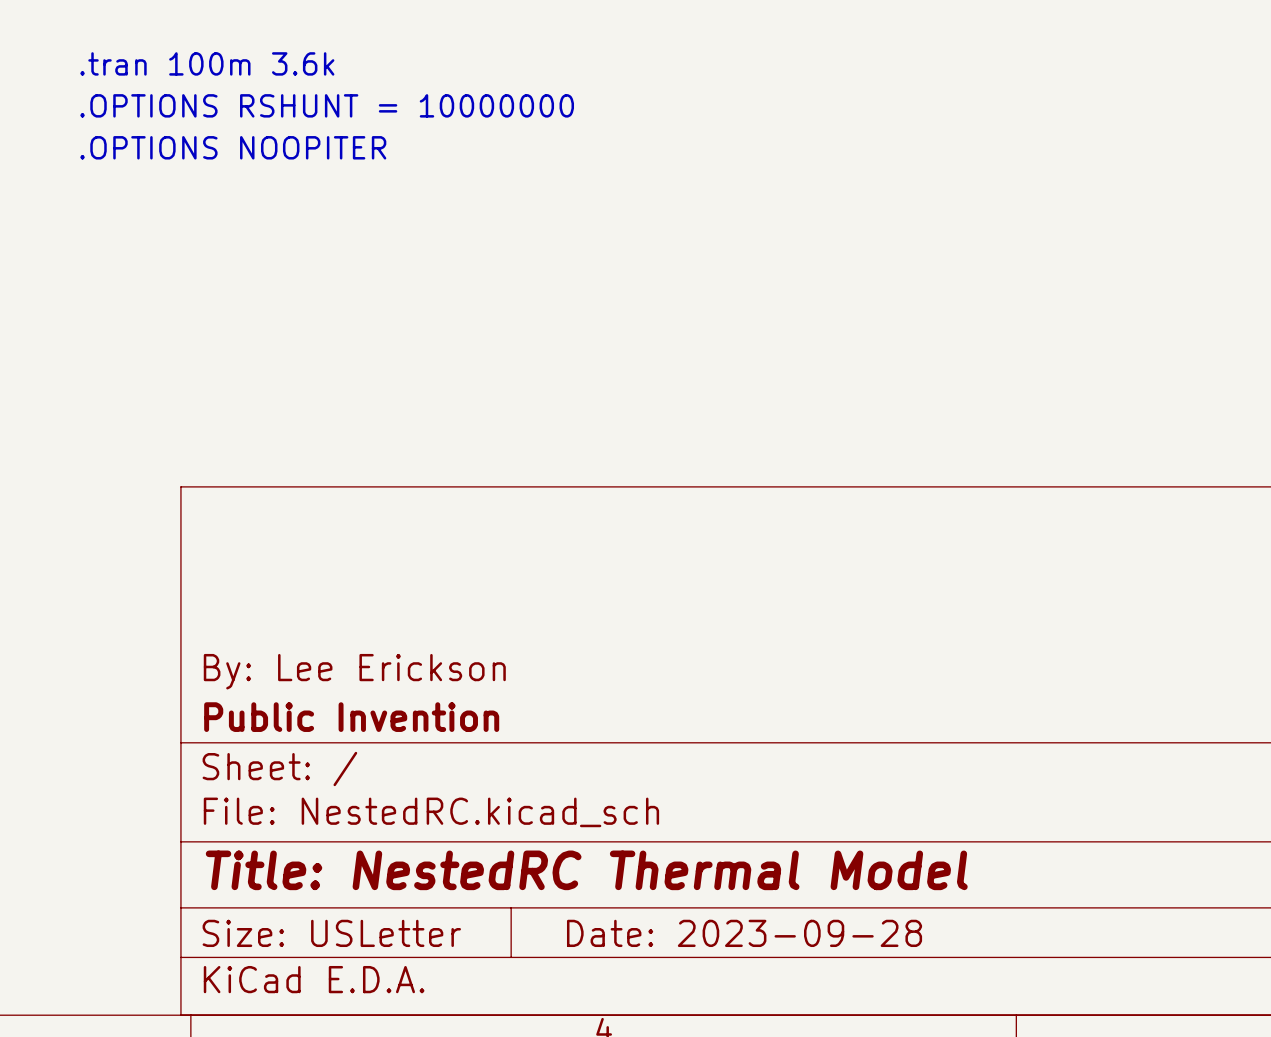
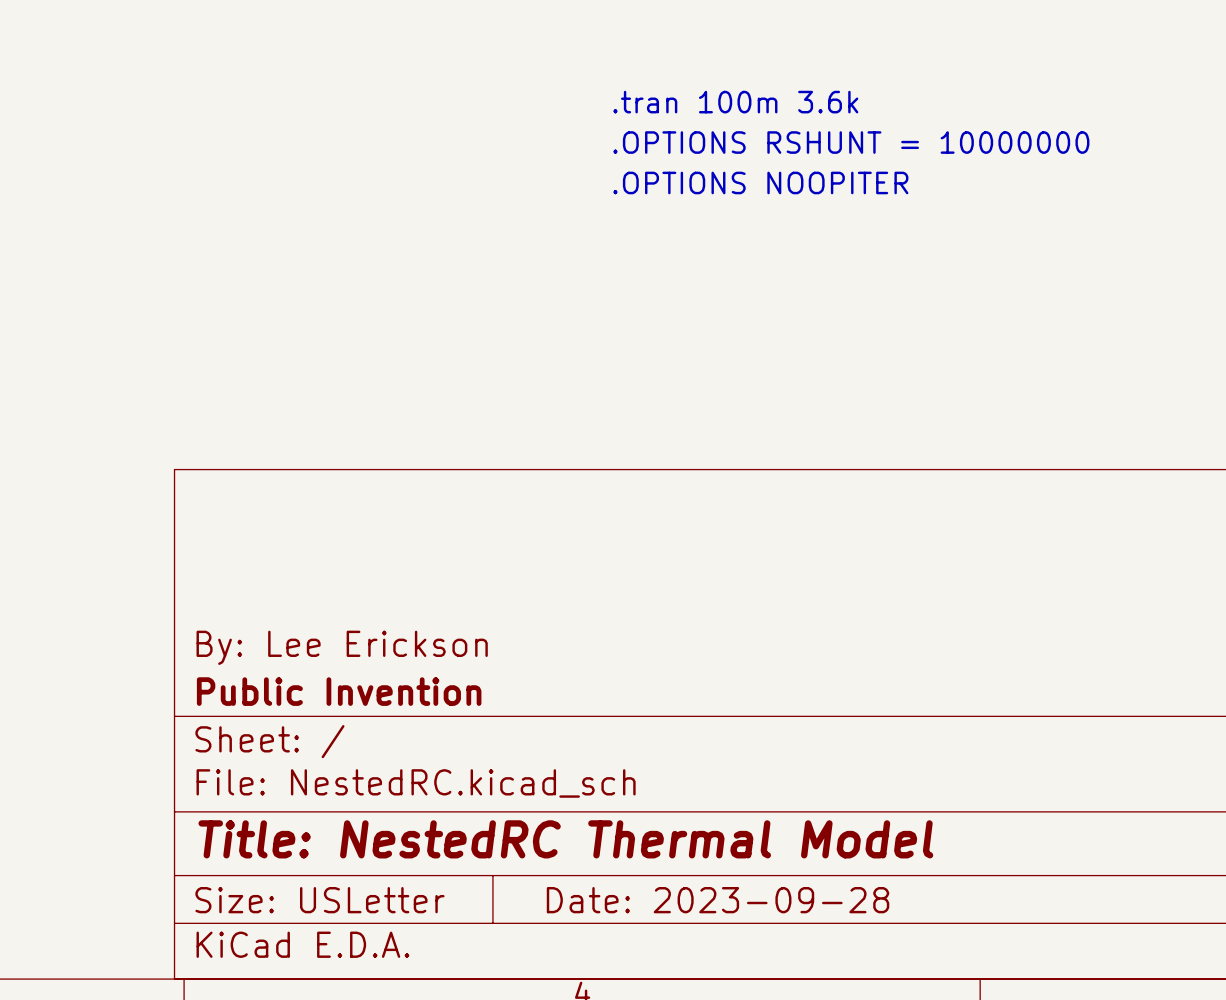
text: .tran 100m 3.6k (207, 63) -> none
text: .OPTIONS RSHUNT = 10000000 (327, 105) -> none
text: none -> .tran 100m 3.6k (735, 102)
text: .OPTIONS NOOPITER (233, 147) -> none
text: none -> .OPTIONS RSHUNT = 10000000 (851, 142)
text: none -> .OPTIONS NOOPITER (760, 182)

